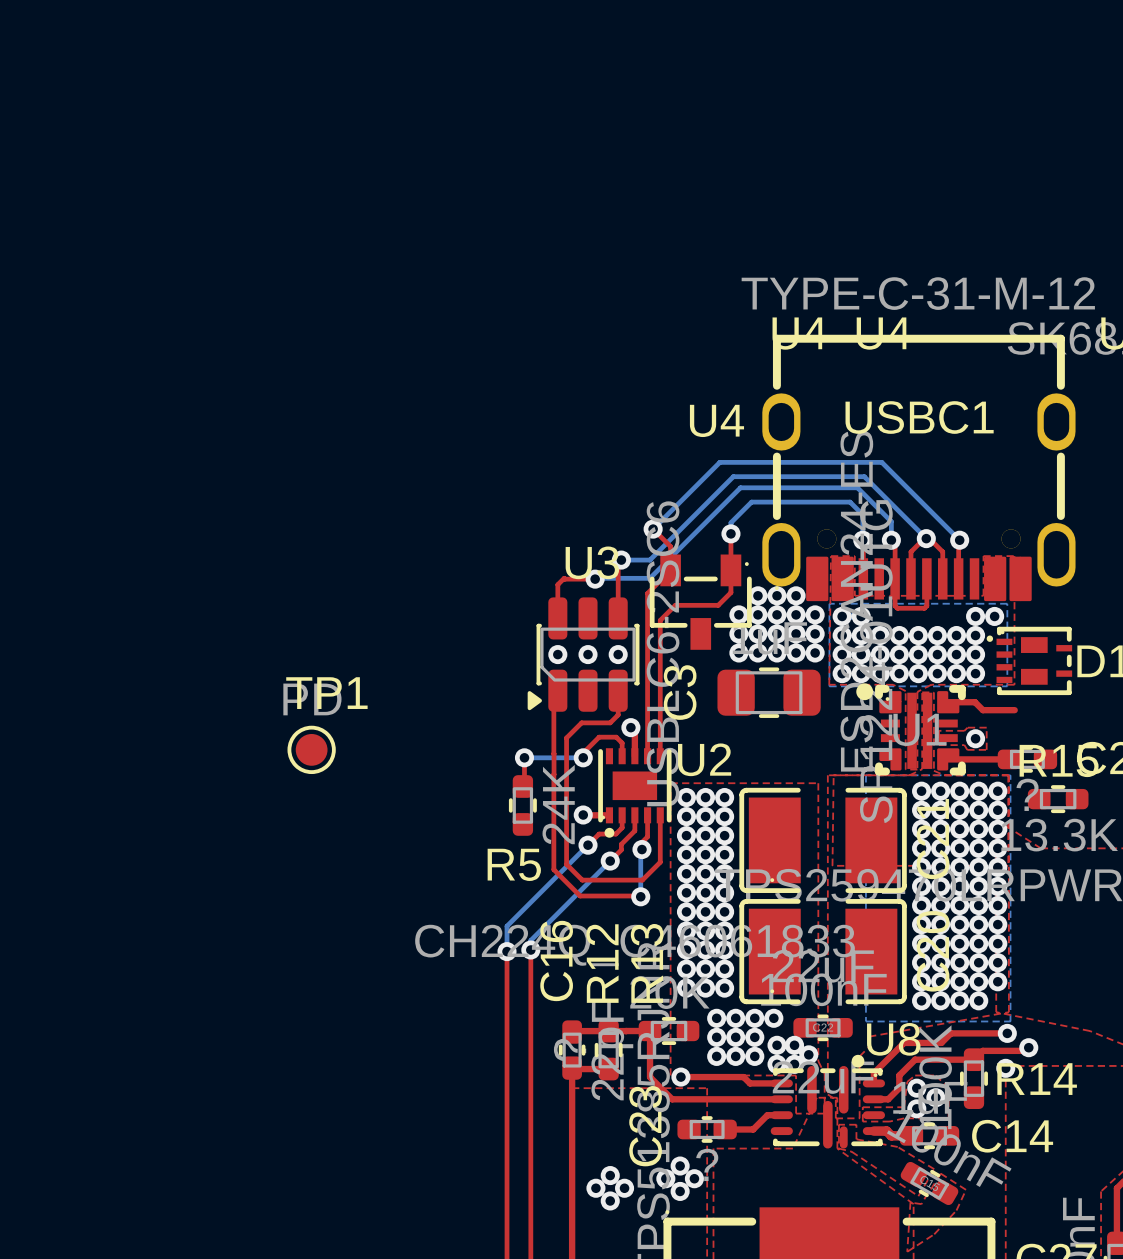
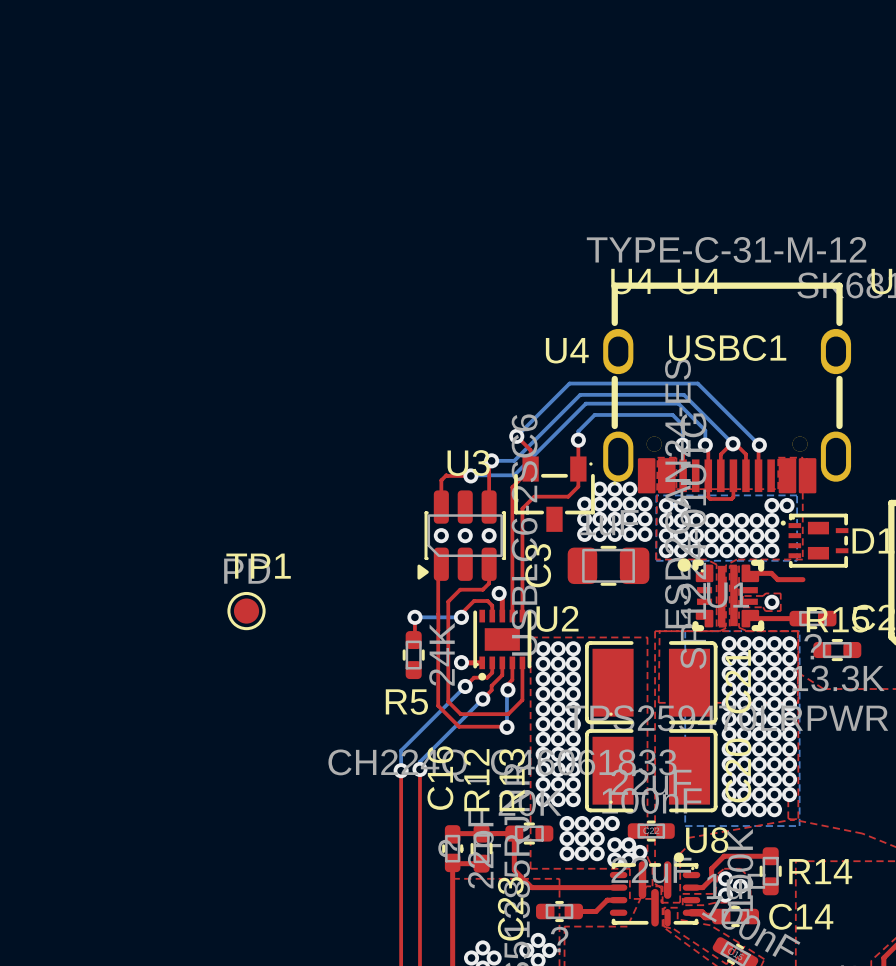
top track: (1007, 1033) (950, 1033) (941, 1042) (904, 1042) (873, 1073) (873, 1083) -> none
via: (1007, 1033) -> none
top track: (1028, 1047) (1025, 1050) (982, 1050) (973, 1059) -> none
via: (1028, 1047) -> none
via: (1005, 1068) -> none
top track: (680, 1077) (743, 1077) (750, 1083) (781, 1083) -> none
via: (680, 1077) -> none

